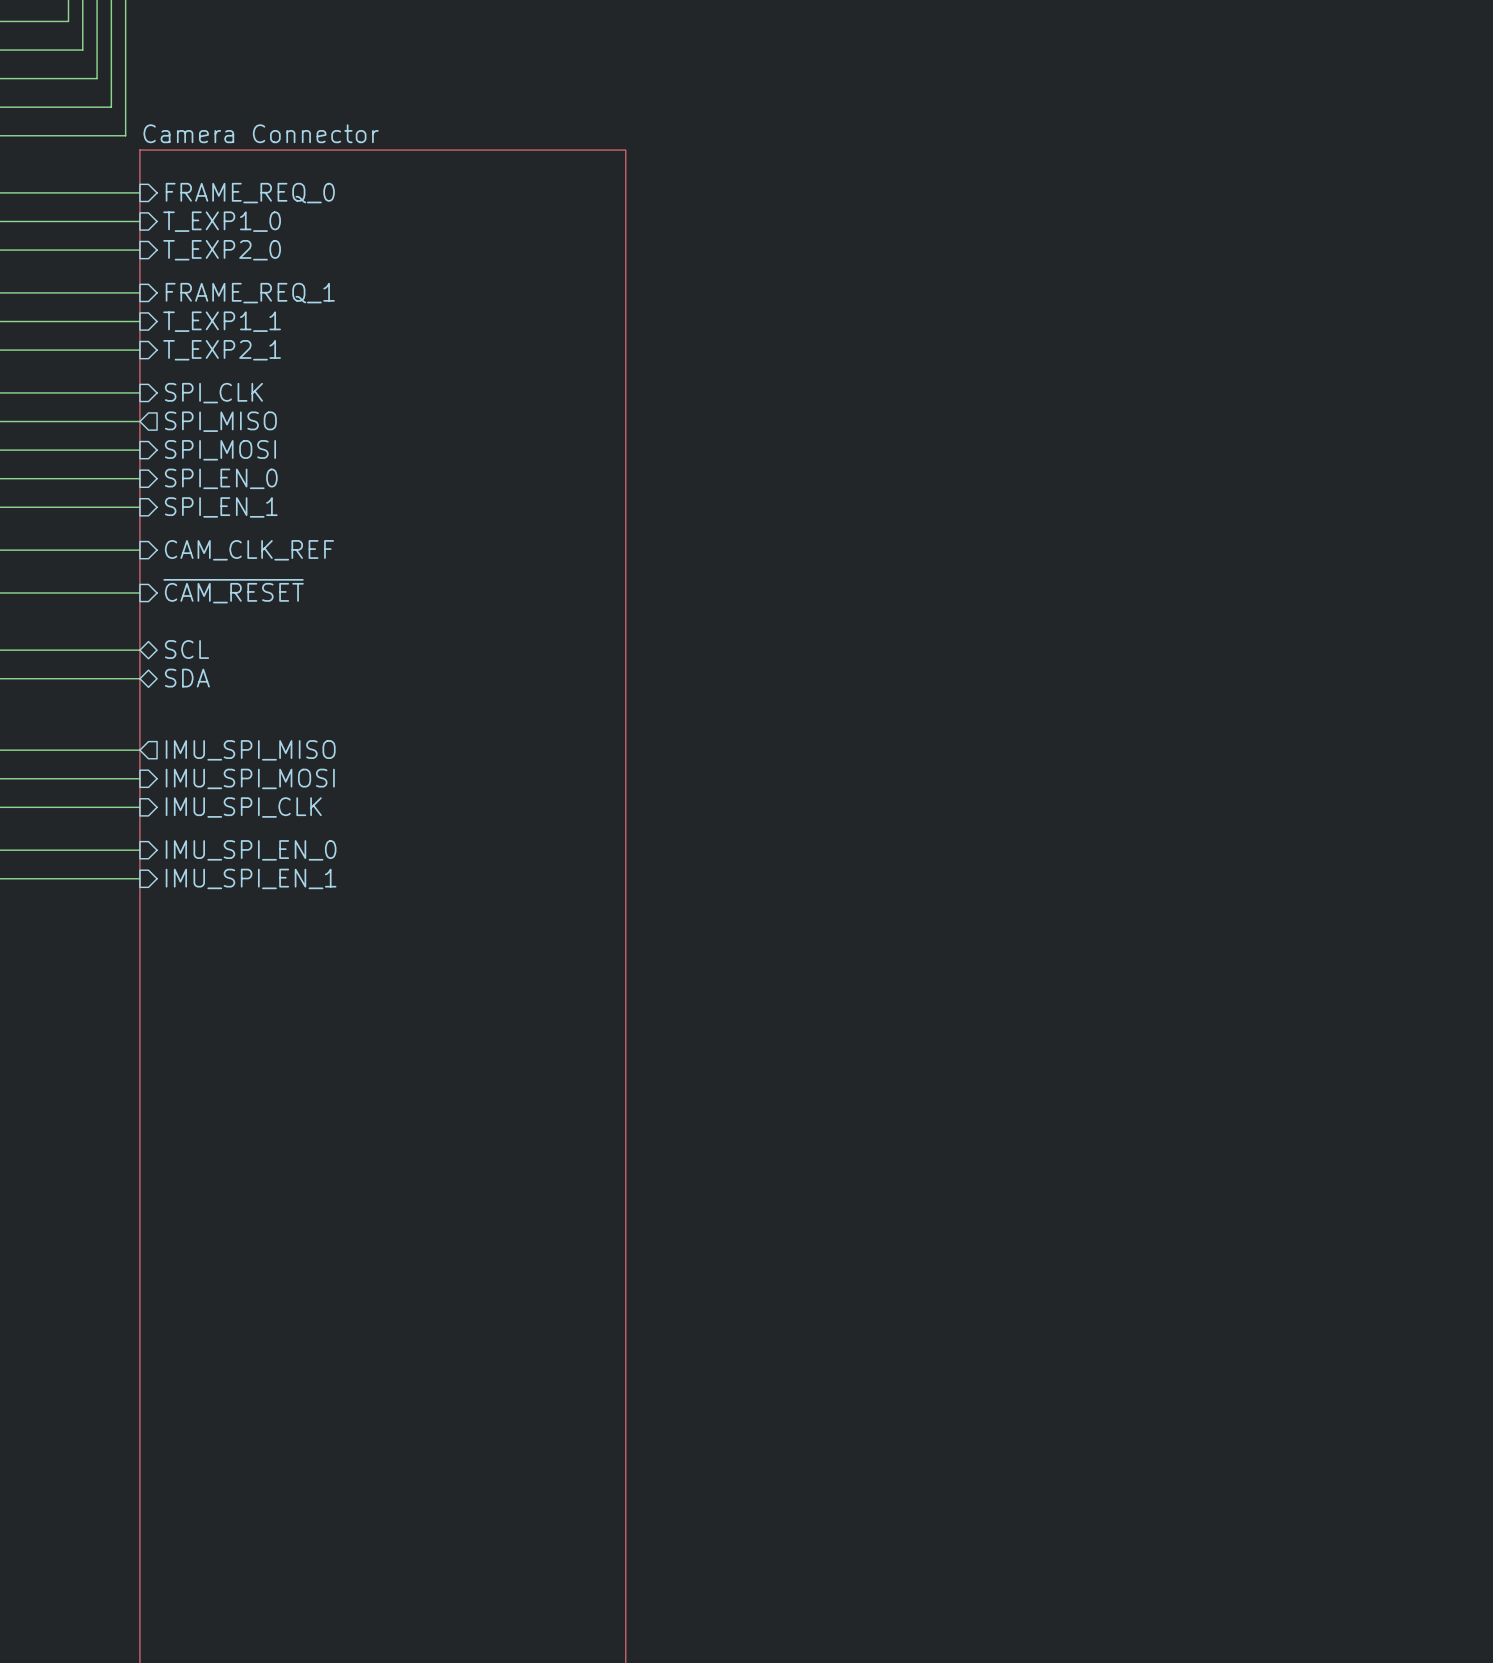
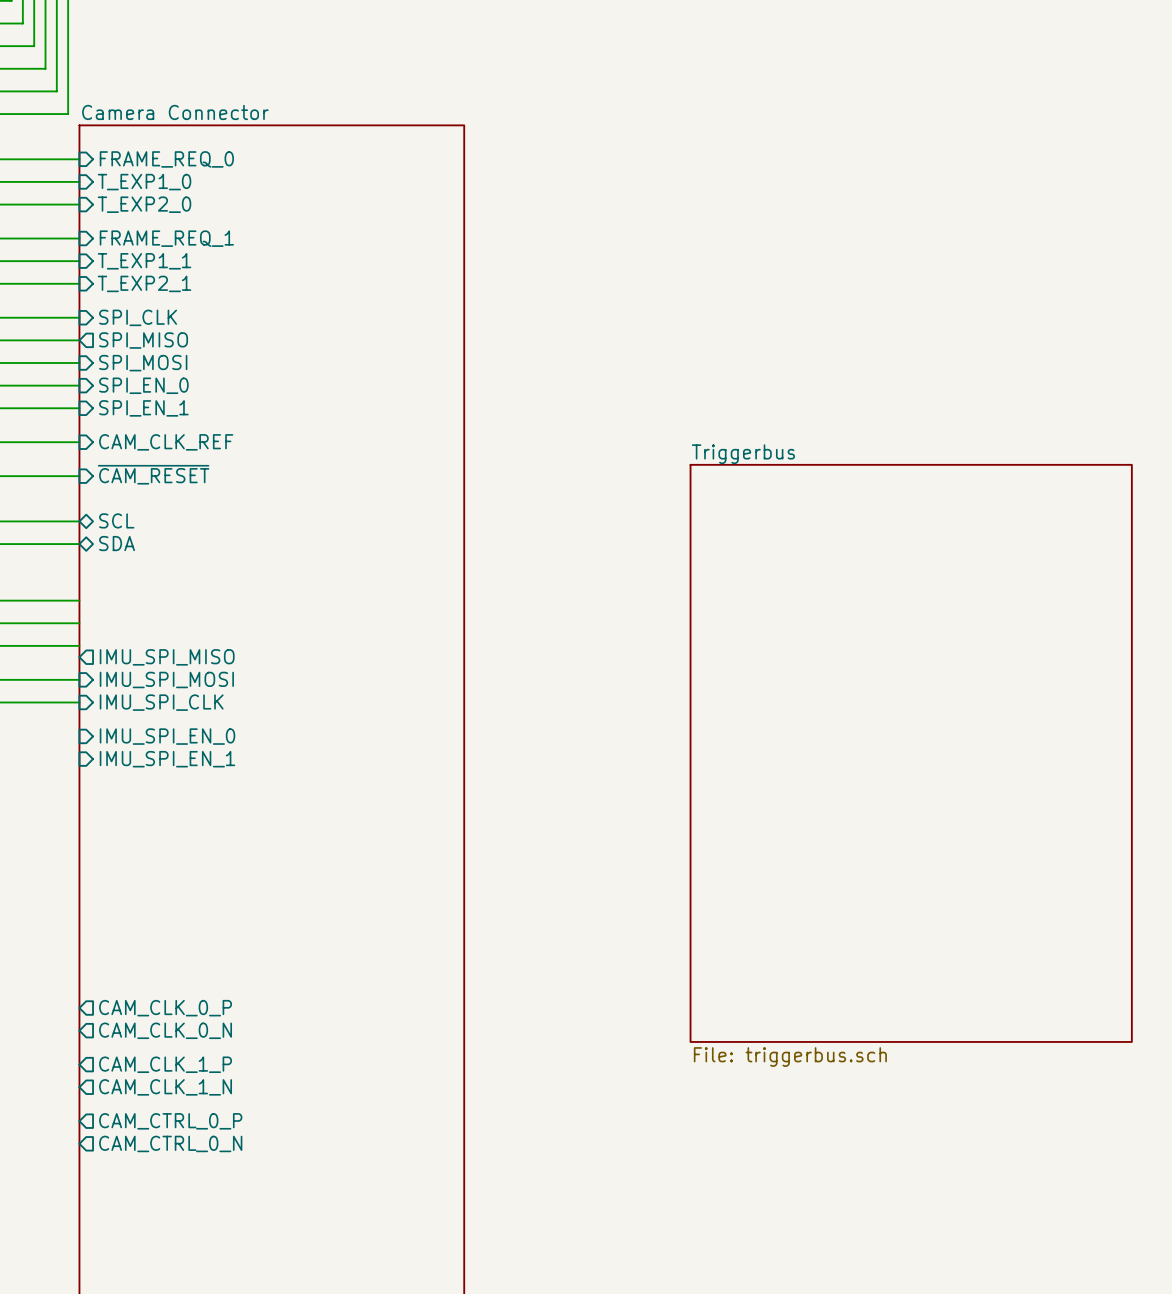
sheet pin position: IMU_SPI_MISO (250, 750) -> IMU_SPI_MISO (167, 657)
sheet pin: IMU_SPI_MOSI (250, 778) -> none
sheet pin: IMU_SPI_CLK (243, 807) -> none
sheet pin: IMU_SPI_EN_0 (251, 850) -> IMU_SPI_MOSI (166, 679)
sheet pin: IMU_SPI_EN_1 (251, 878) -> IMU_SPI_CLK (161, 702)
sheet pin: none -> IMU_SPI_EN_0 (167, 736)
sheet Triggerbus: none -> File: triggerbus.sch (911, 753)
sheet pin: none -> IMU_SPI_EN_1 (167, 759)
sheet pin: none -> CAM_CLK_0_P (165, 1008)
sheet pin: none -> CAM_CLK_0_N (165, 1030)
sheet pin: none -> CAM_CLK_1_P (165, 1064)
sheet pin: none -> CAM_CLK_1_N (165, 1087)
sheet pin: none -> CAM_CTRL_0_P (170, 1121)
sheet pin: none -> CAM_CTRL_0_N (170, 1143)

